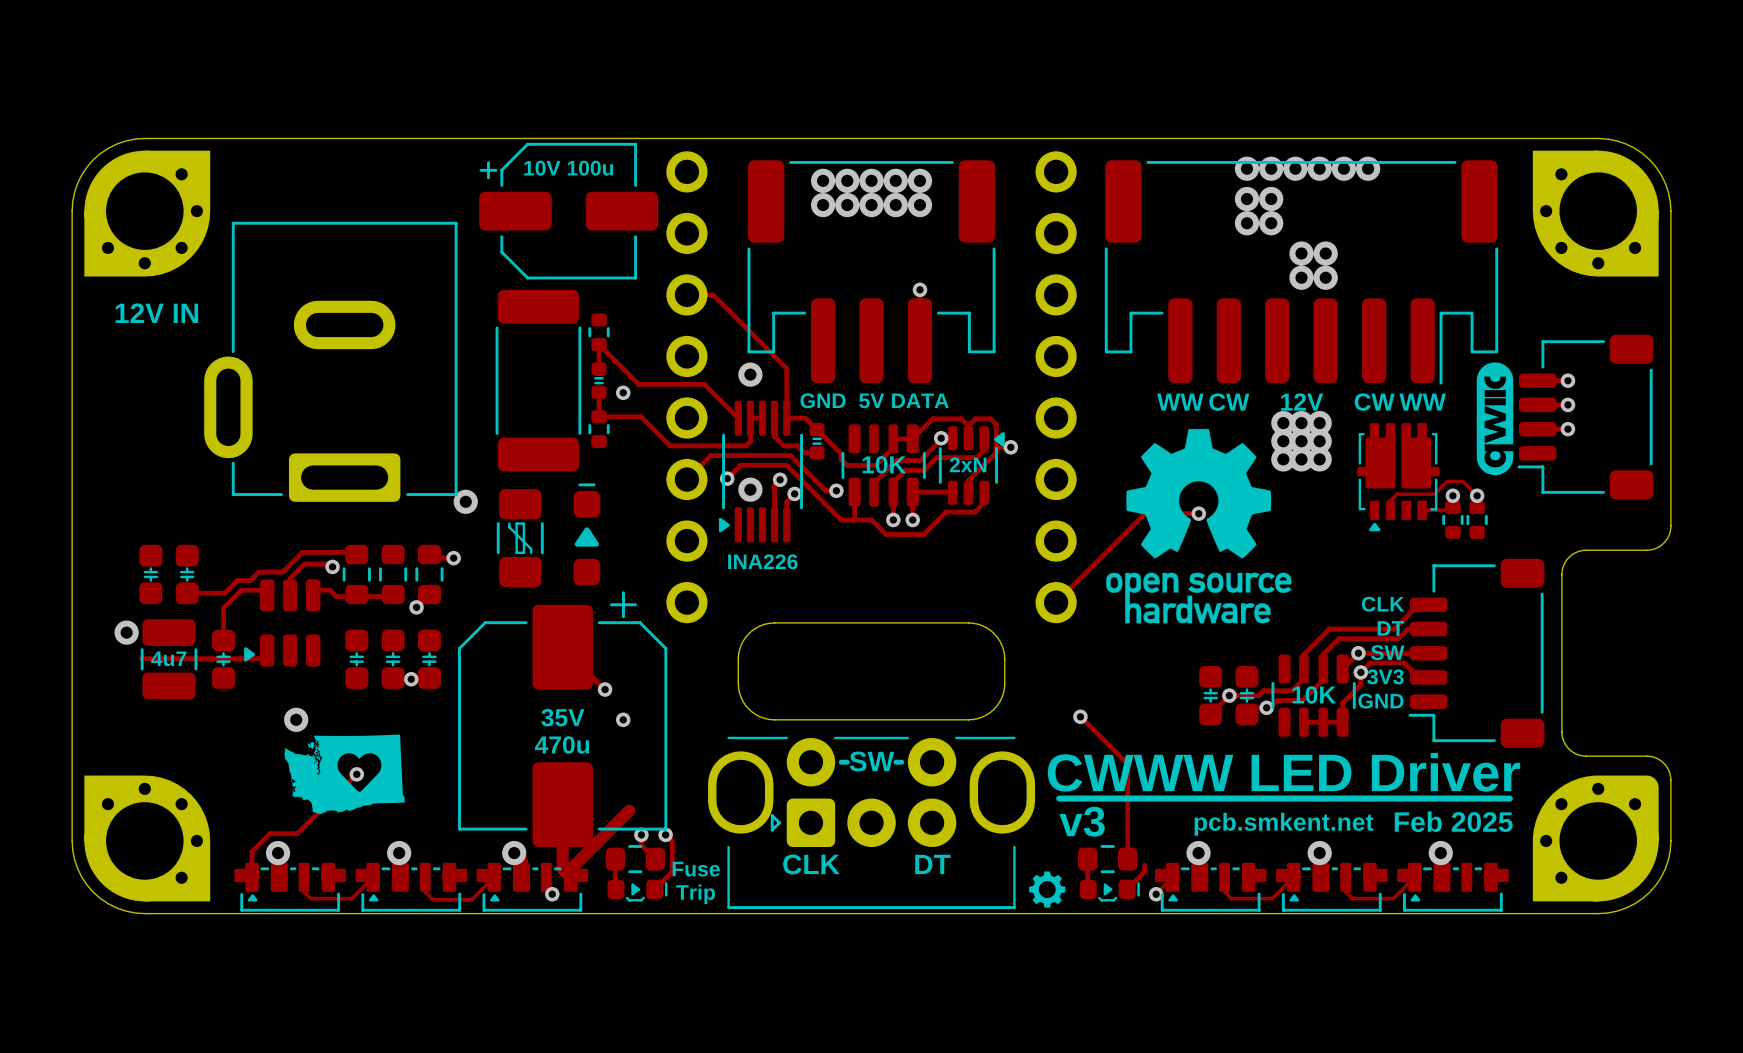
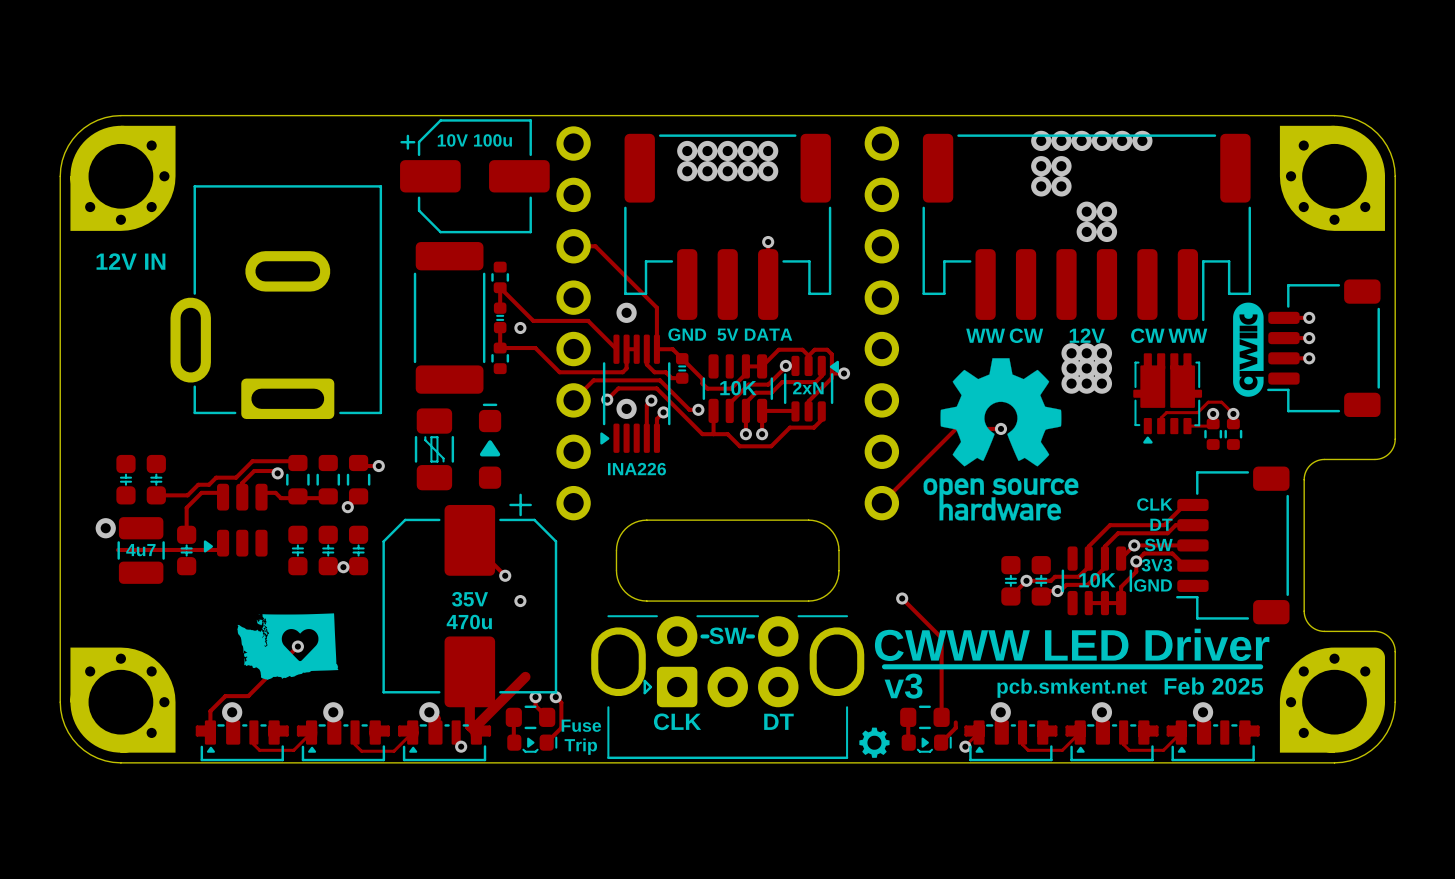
via: (465, 501) -> none
via: (296, 719) -> none

